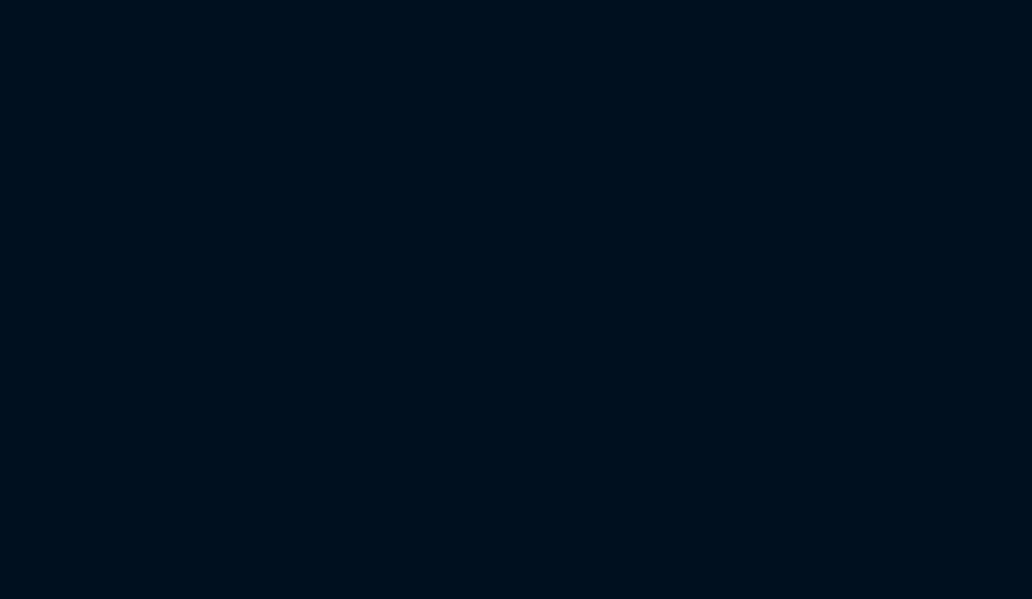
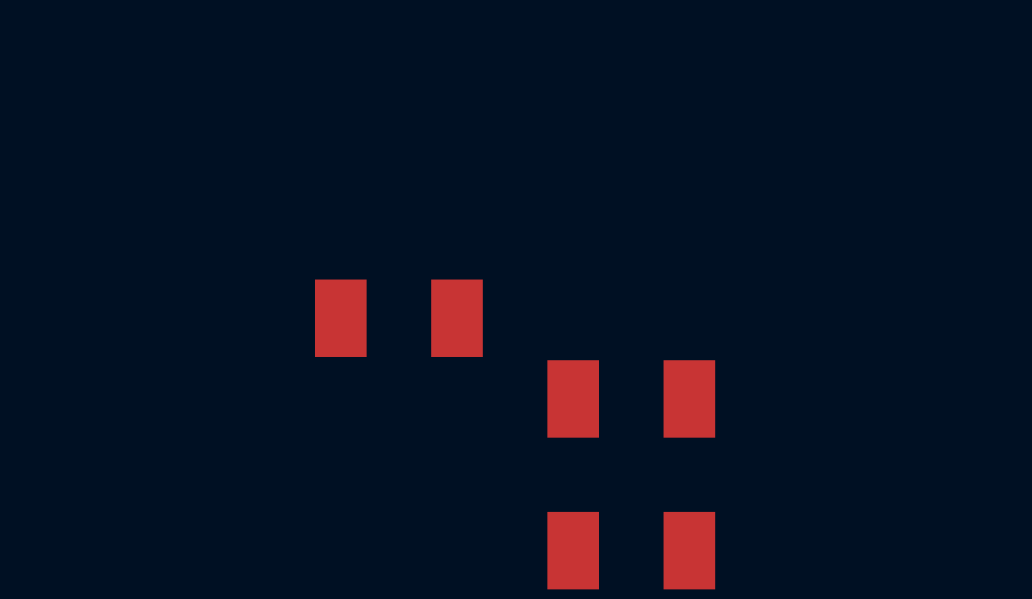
part: none -> (398, 318)
part: none -> (631, 398)
part: none -> (631, 550)

